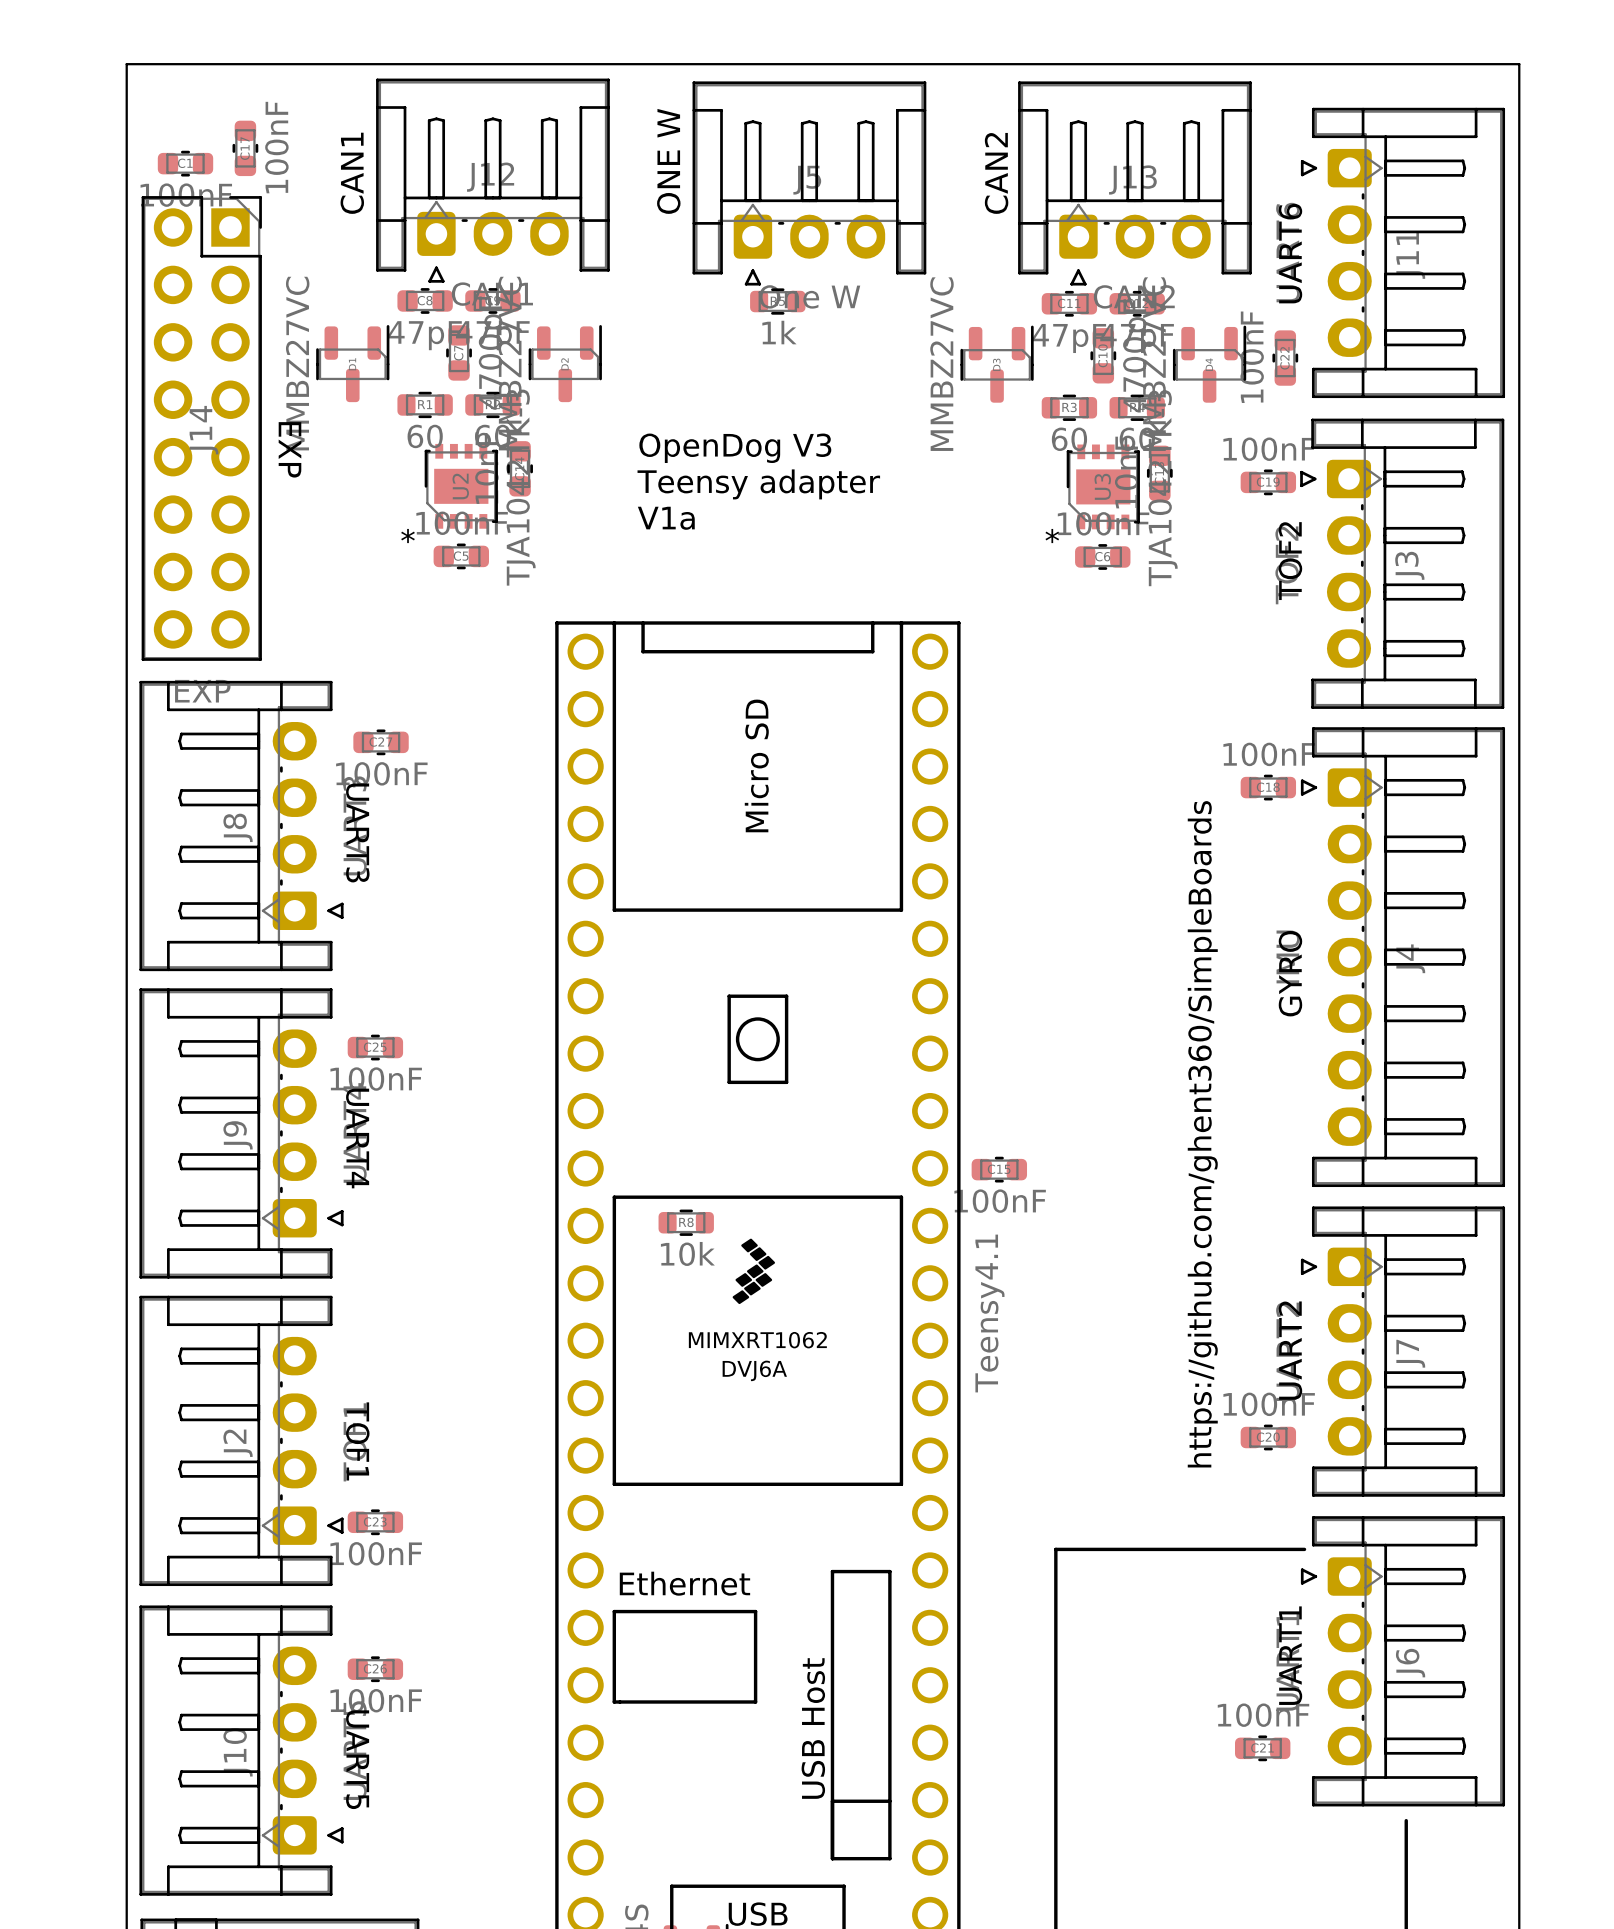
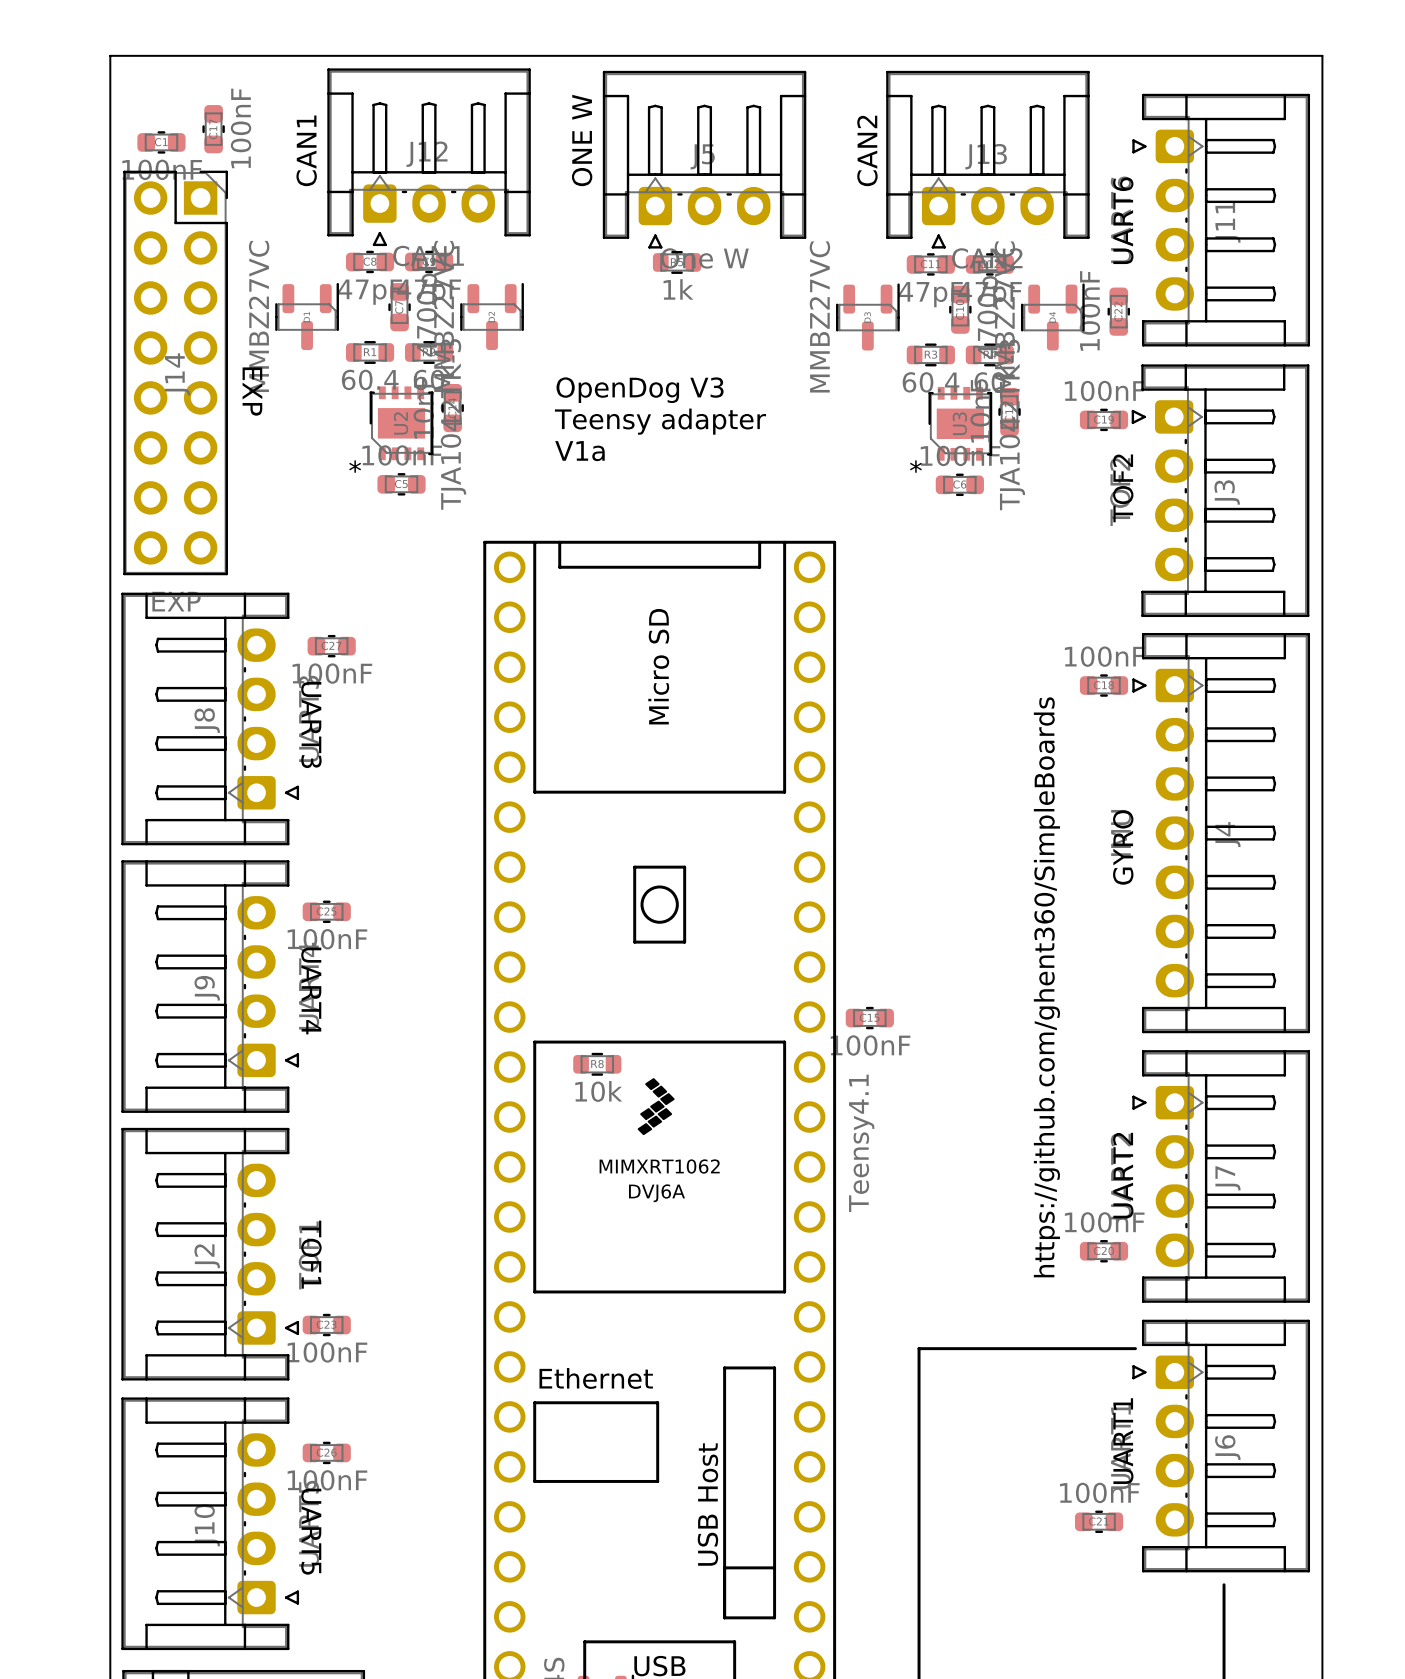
R1 value: 60 (425, 436) -> 60.4 (370, 379)
R3 value: 60 (1069, 439) -> 60.4 (931, 382)

